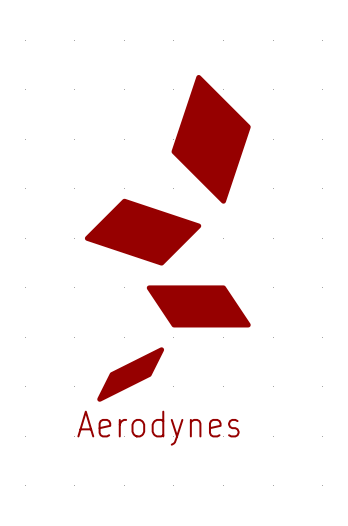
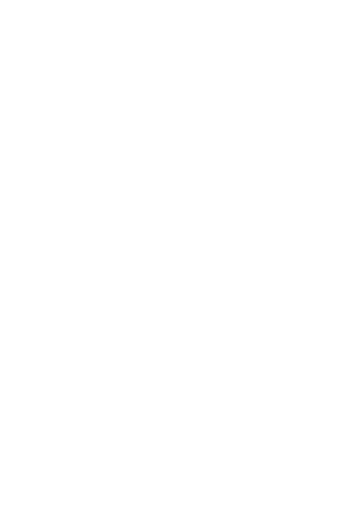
part: (167, 238) -> none

